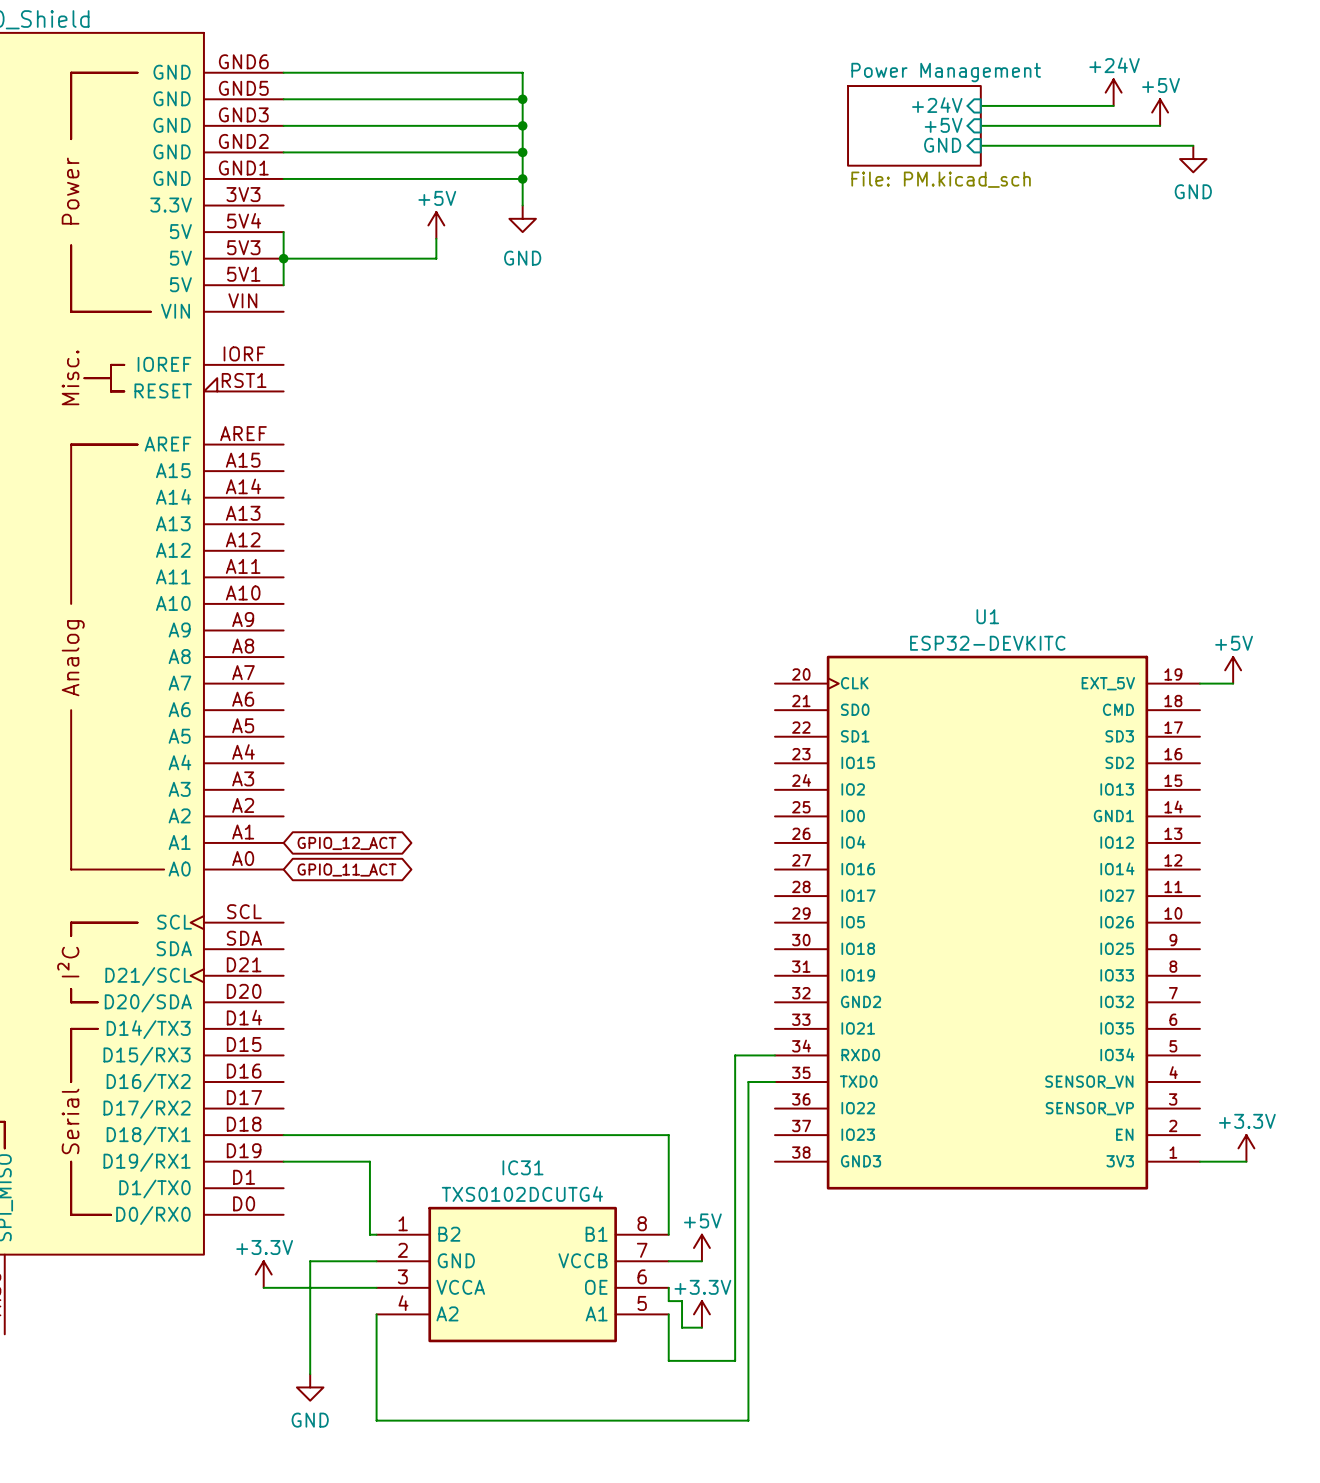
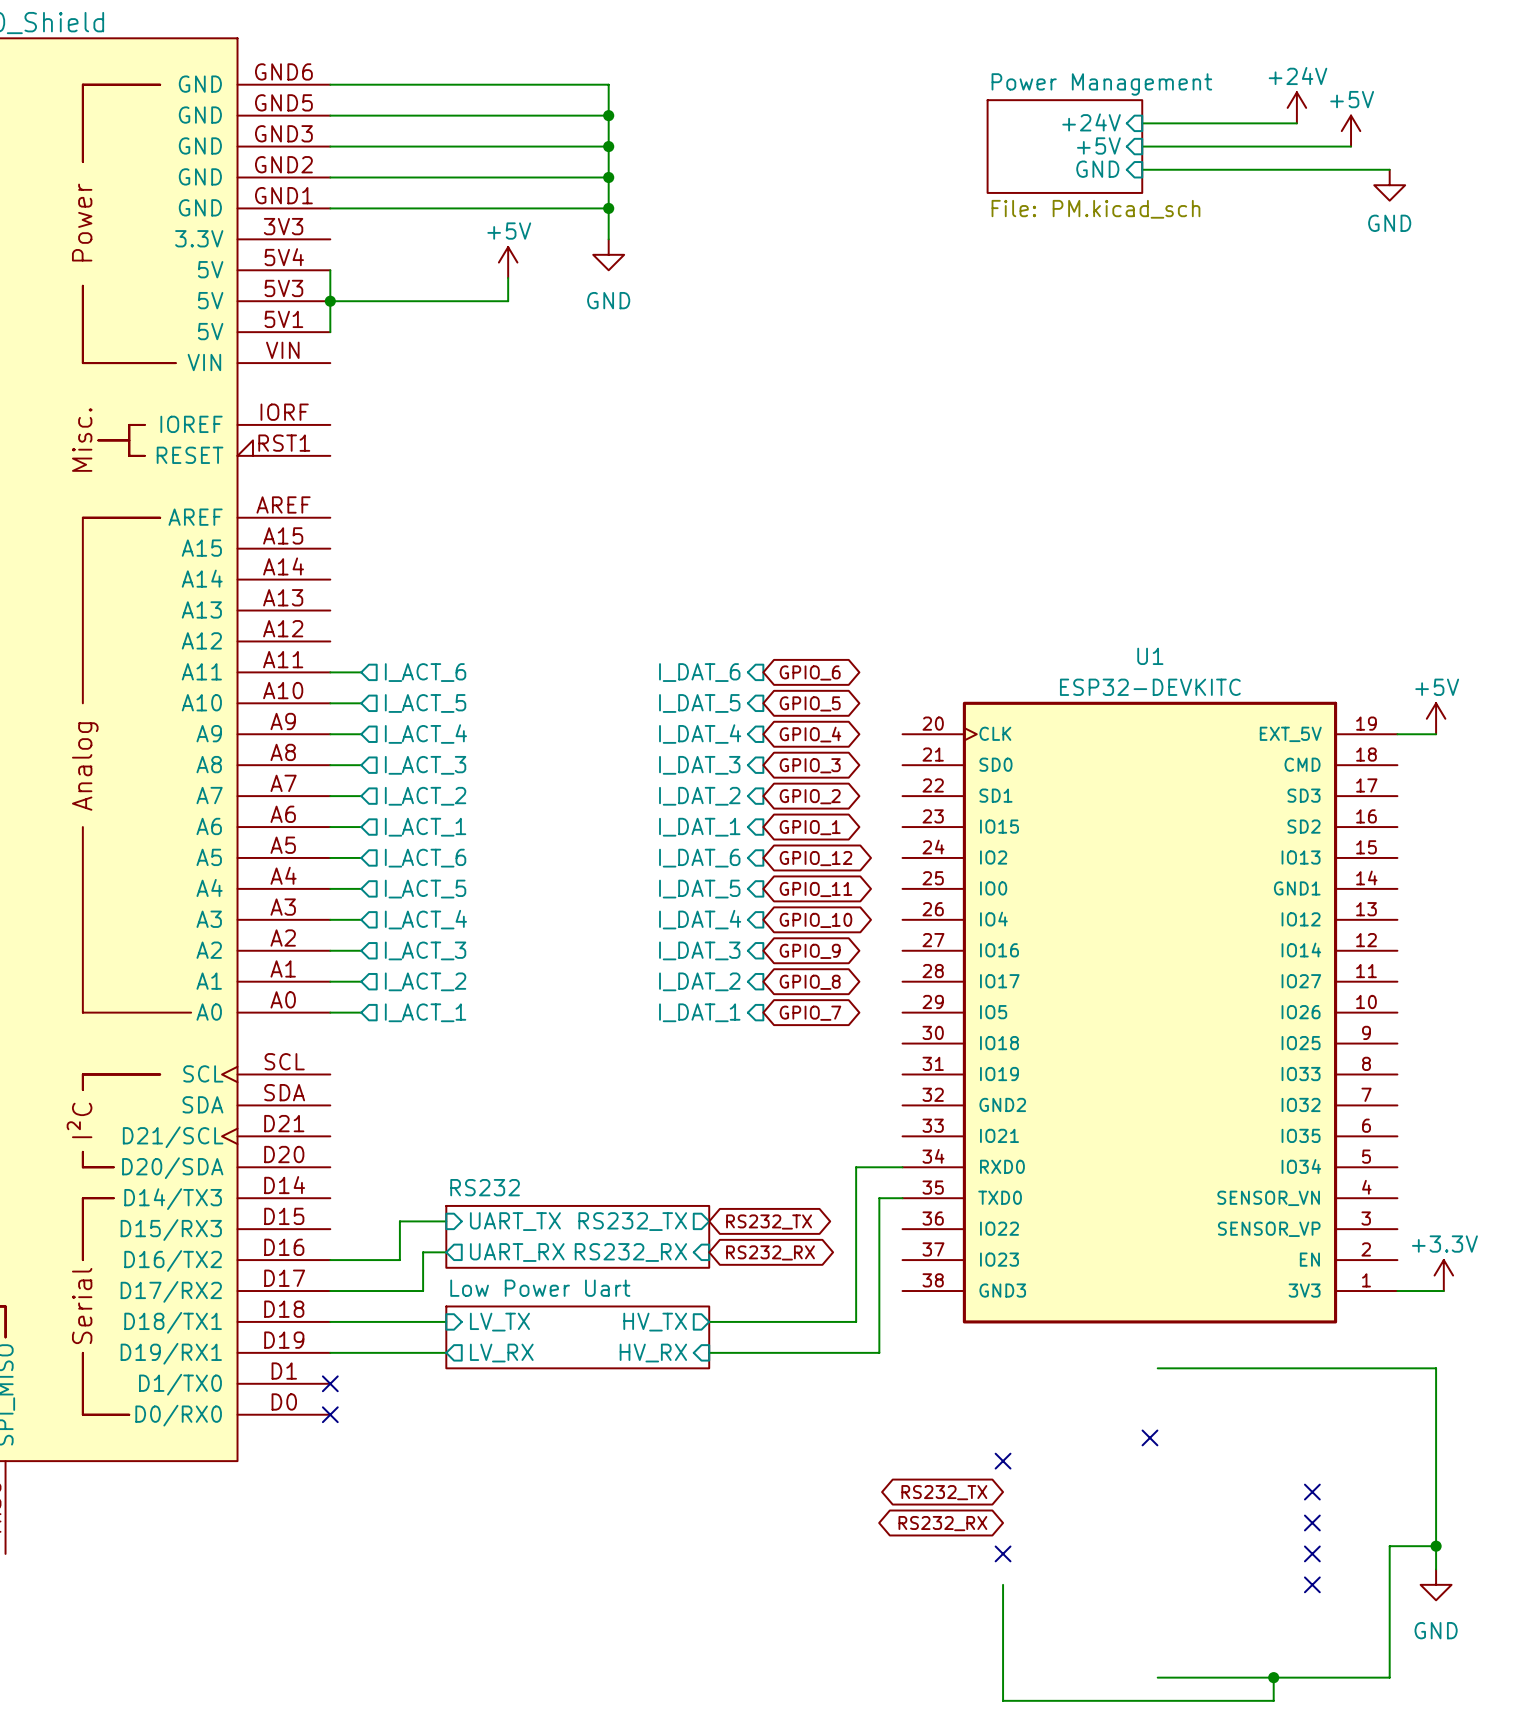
wire: none -> (330, 672) (361, 672)
sheet pin: none -> I_ACT_6 (425, 672)
sheet pin: none -> I_DAT_6 (699, 672)
global label: none -> GPIO_6 (810, 672)
wire: none -> (330, 703) (361, 703)
sheet pin: none -> I_ACT_5 (425, 703)
sheet pin: none -> I_DAT_5 (699, 703)
global label: none -> GPIO_5 (810, 703)
wire: none -> (330, 734) (361, 734)
sheet pin: none -> I_ACT_4 (425, 734)
sheet pin: none -> I_DAT_4 (700, 734)
global label: none -> GPIO_4 (810, 734)
wire: none -> (330, 765) (361, 765)
sheet pin: none -> I_ACT_3 (425, 765)
sheet pin: none -> I_DAT_3 (699, 765)
global label: none -> GPIO_3 (810, 765)
power symbol position: +5V (1233, 670) -> +5V (1436, 718)
wire: none -> (330, 796) (361, 796)
sheet pin: none -> I_ACT_2 (425, 796)
sheet pin: none -> I_DAT_2 (699, 796)
wire: (1199, 683) (1233, 683) -> (1397, 734) (1436, 734)
global label: none -> GPIO_2 (810, 796)
wire: none -> (330, 827) (361, 827)
sheet pin: none -> I_ACT_1 (425, 827)
sheet pin: none -> I_DAT_1 (699, 827)
global label: none -> GPIO_1 (810, 827)
wire: none -> (330, 857) (361, 857)
sheet pin: none -> I_ACT_6 (425, 858)
sheet pin: none -> I_DAT_6 (699, 858)
global label: none -> GPIO_12 (815, 858)
wire: none -> (330, 888) (361, 888)
sheet pin: none -> I_ACT_5 (425, 889)
sheet pin: none -> I_DAT_5 (699, 889)
global label: none -> GPIO_11 (815, 889)
wire: none -> (330, 919) (361, 919)
sheet pin: none -> I_ACT_4 (425, 919)
sheet pin: none -> I_DAT_4 (700, 919)
global label: none -> GPIO_10 (815, 920)
wire: none -> (330, 950) (361, 950)
sheet pin: none -> I_ACT_3 (425, 950)
sheet pin: none -> I_DAT_3 (699, 950)
global label: none -> GPIO_9 (810, 951)
wire: none -> (330, 981) (361, 981)
global label: GPIO_12_ACT (346, 843) -> none
sheet pin: none -> I_ACT_2 (425, 981)
sheet pin: none -> I_DAT_2 (699, 981)
global label: none -> GPIO_8 (810, 982)
wire: none -> (330, 1012) (361, 1012)
sheet pin: none -> I_ACT_1 (425, 1012)
sheet pin: none -> I_DAT_1 (699, 1012)
global label: GPIO_11_ACT (346, 870) -> none
global label: none -> GPIO_7 (810, 1013)
U1 position: (987, 922) -> (1149, 1012)
wire: none -> (902, 1198) (879, 1198) (879, 1352) (709, 1352)
wire: none -> (446, 1221) (399, 1221) (399, 1260) (330, 1260)
sheet pin: none -> UART_TX (515, 1221)
sheet pin: none -> RS232_TX (632, 1221)
global label: none -> RS232_TX (769, 1221)
wire: (735, 1055) (774, 1055) -> (856, 1229) (856, 1167) (902, 1167)
sheet RS232: none -> (577, 1236)
wire: none -> (446, 1252) (423, 1252) (423, 1291) (330, 1291)
sheet pin: none -> UART_RX (517, 1252)
sheet pin: none -> RS232_RX (630, 1252)
global label: none -> RS232_RX (770, 1252)
wire: (774, 1082) (748, 1082) (748, 1420) (376, 1420) (376, 1314) -> none
wire: none -> (1397, 1291) (1443, 1291)
wire: (383, 1135) (608, 1135) -> none
sheet pin: none -> LV_TX (499, 1322)
sheet pin: none -> HV_TX (655, 1322)
wire: (668, 1135) (668, 1234) -> (778, 1321) (856, 1321)
wire: (735, 1135) (735, 1360) (668, 1360) (668, 1314) -> none
sheet Low Power Uart: none -> (577, 1337)
power symbol position: +3.3V (1246, 1148) -> +3.3V (1443, 1275)
wire: (369, 1161) (369, 1234) (376, 1234) -> (430, 1352) (446, 1352)
sheet pin: none -> LV_RX (501, 1353)
sheet pin: none -> HV_RX (653, 1353)
wire: (1199, 1161) (1246, 1161) -> none
wire: none -> (1157, 1368) (1436, 1368) (1436, 1569)
no-connect mark: none -> (330, 1383)
no-connect mark: none -> (330, 1414)
no-connect mark: none -> (1149, 1437)
power symbol: +5V (701, 1247) -> none
no-connect mark: none -> (1003, 1461)
wire: (376, 1261) (310, 1261) (310, 1374) -> none
wire: (668, 1261) (701, 1261) -> none
power symbol: +3.3V (263, 1274) -> none
IC31: TXS0102DCUTG4 (522, 1274) -> none
global label: none -> RS232_TX (944, 1492)
no-connect mark: none -> (1312, 1492)
wire: (263, 1287) (376, 1287) -> none
wire: (668, 1287) (668, 1301) (682, 1301) (682, 1327) (701, 1327) -> none
no-connect mark: none -> (1312, 1522)
global label: none -> RS232_RX (942, 1523)
power symbol: +3.3V (701, 1314) -> none
wire: none -> (1436, 1546) (1389, 1546) (1389, 1677) (1157, 1677)
junction: none -> (1436, 1546)
no-connect mark: none -> (1003, 1553)
no-connect mark: none -> (1312, 1553)
wire: none -> (1003, 1584) (1003, 1700) (1273, 1700) (1273, 1677)
no-connect mark: none -> (1312, 1584)
power symbol: none -> GND (1436, 1584)
power symbol: GND (310, 1387) -> none
junction: none -> (1273, 1677)

